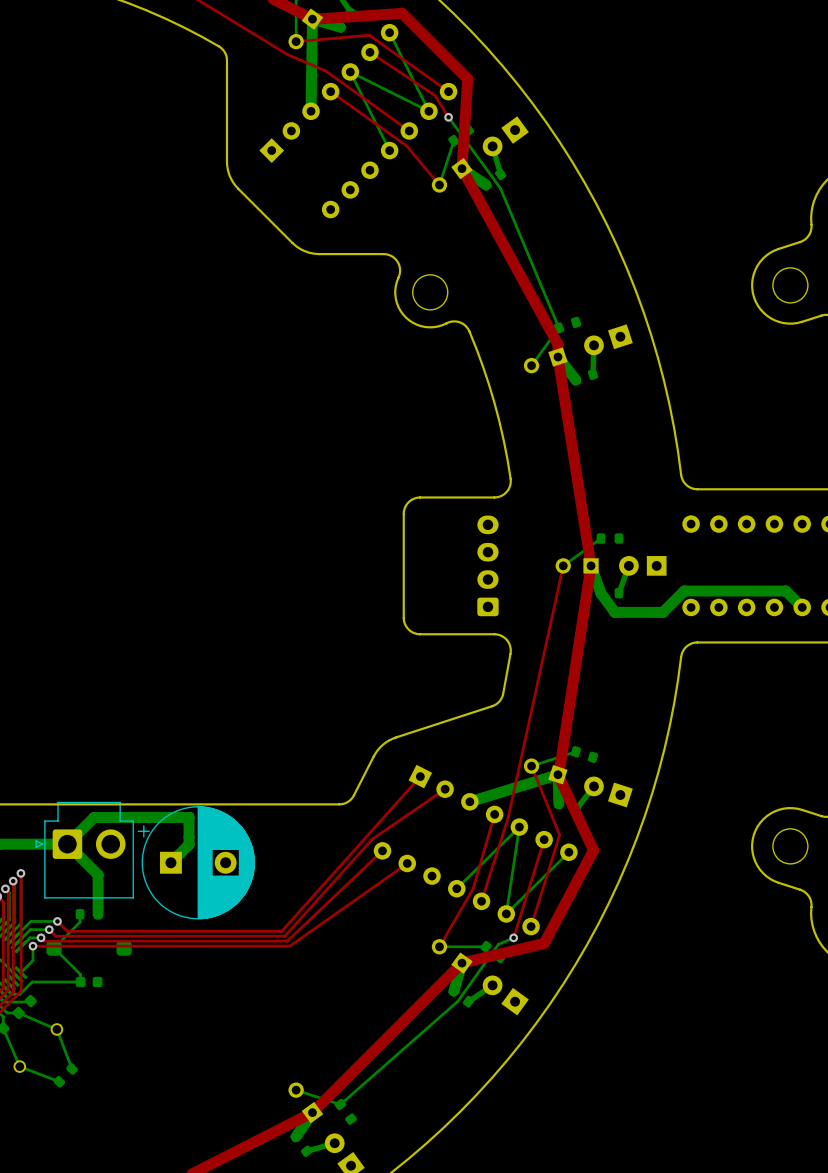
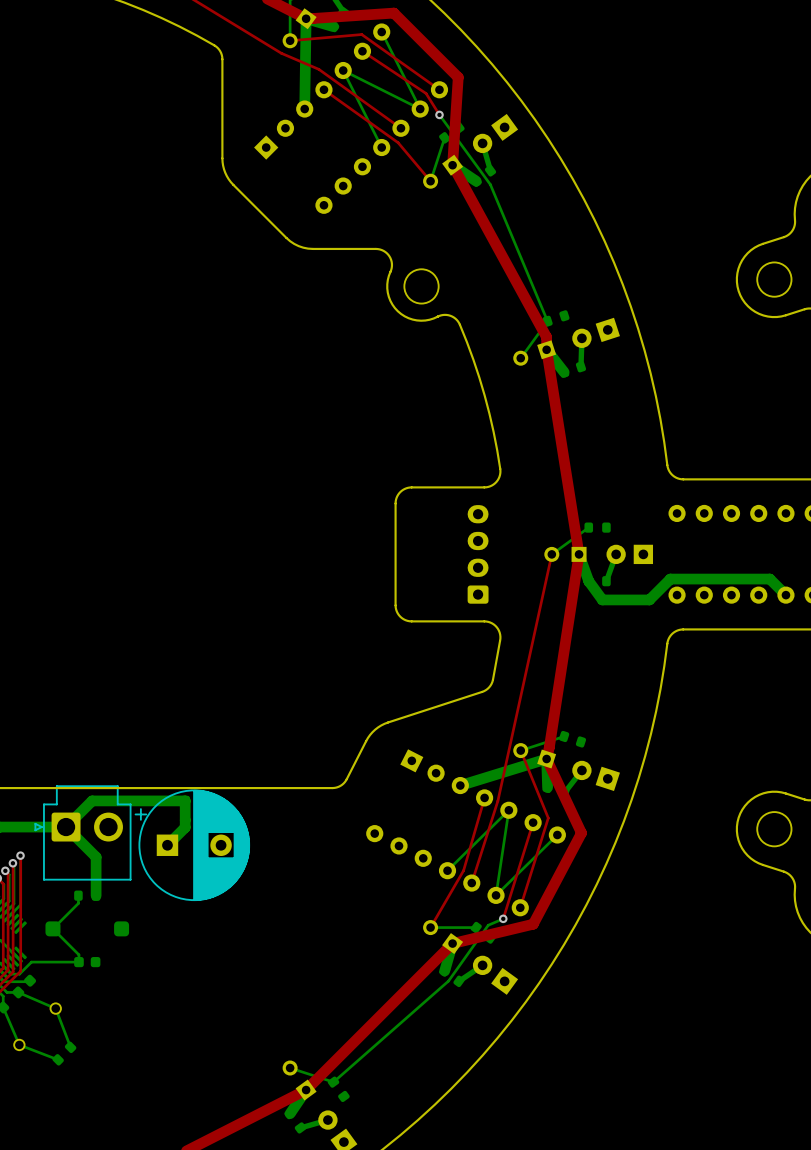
top track: (420, 776) (281, 931) (67, 931) (57, 921) -> none
top track: (445, 789) (372, 839) (284, 936) (55, 936) (49, 929) -> none
top track: (382, 850) (287, 941) (44, 941) (41, 937) -> none
top track: (407, 863) (289, 946) (32, 946) -> none
bottom track: (57, 921) (30, 921) (13, 939) -> none
via: (57, 921) -> none
bottom track: (49, 929) (30, 929) (17, 943) -> none
via: (49, 929) -> none
bottom track: (41, 937) (29, 937) (20, 946) -> none
via: (41, 937) -> none
bottom track: (32, 946) (32, 960) (20, 972) -> none
via: (32, 946) -> none

